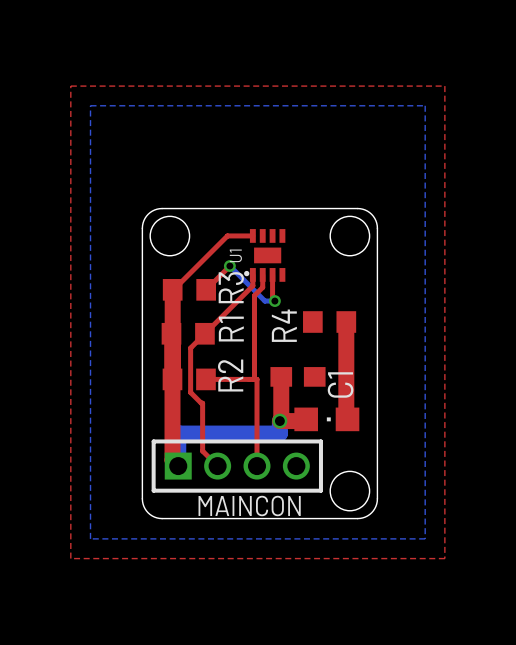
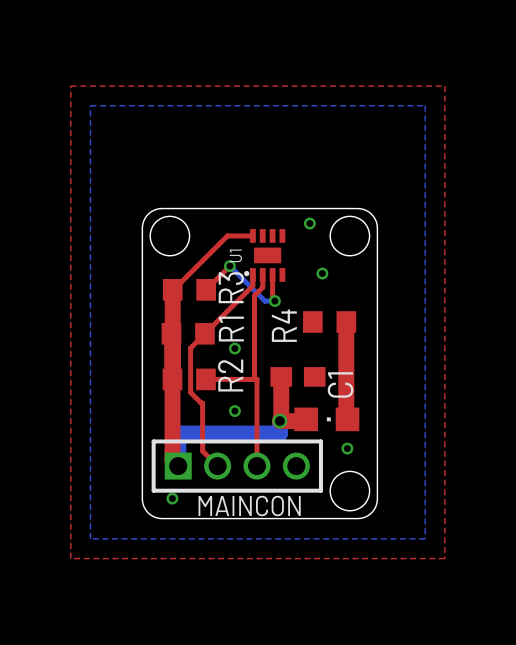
via: none -> (309, 223)
via: none -> (322, 273)
via: none -> (234, 348)
via: none -> (234, 411)
via: none -> (347, 448)
via: none -> (172, 498)

